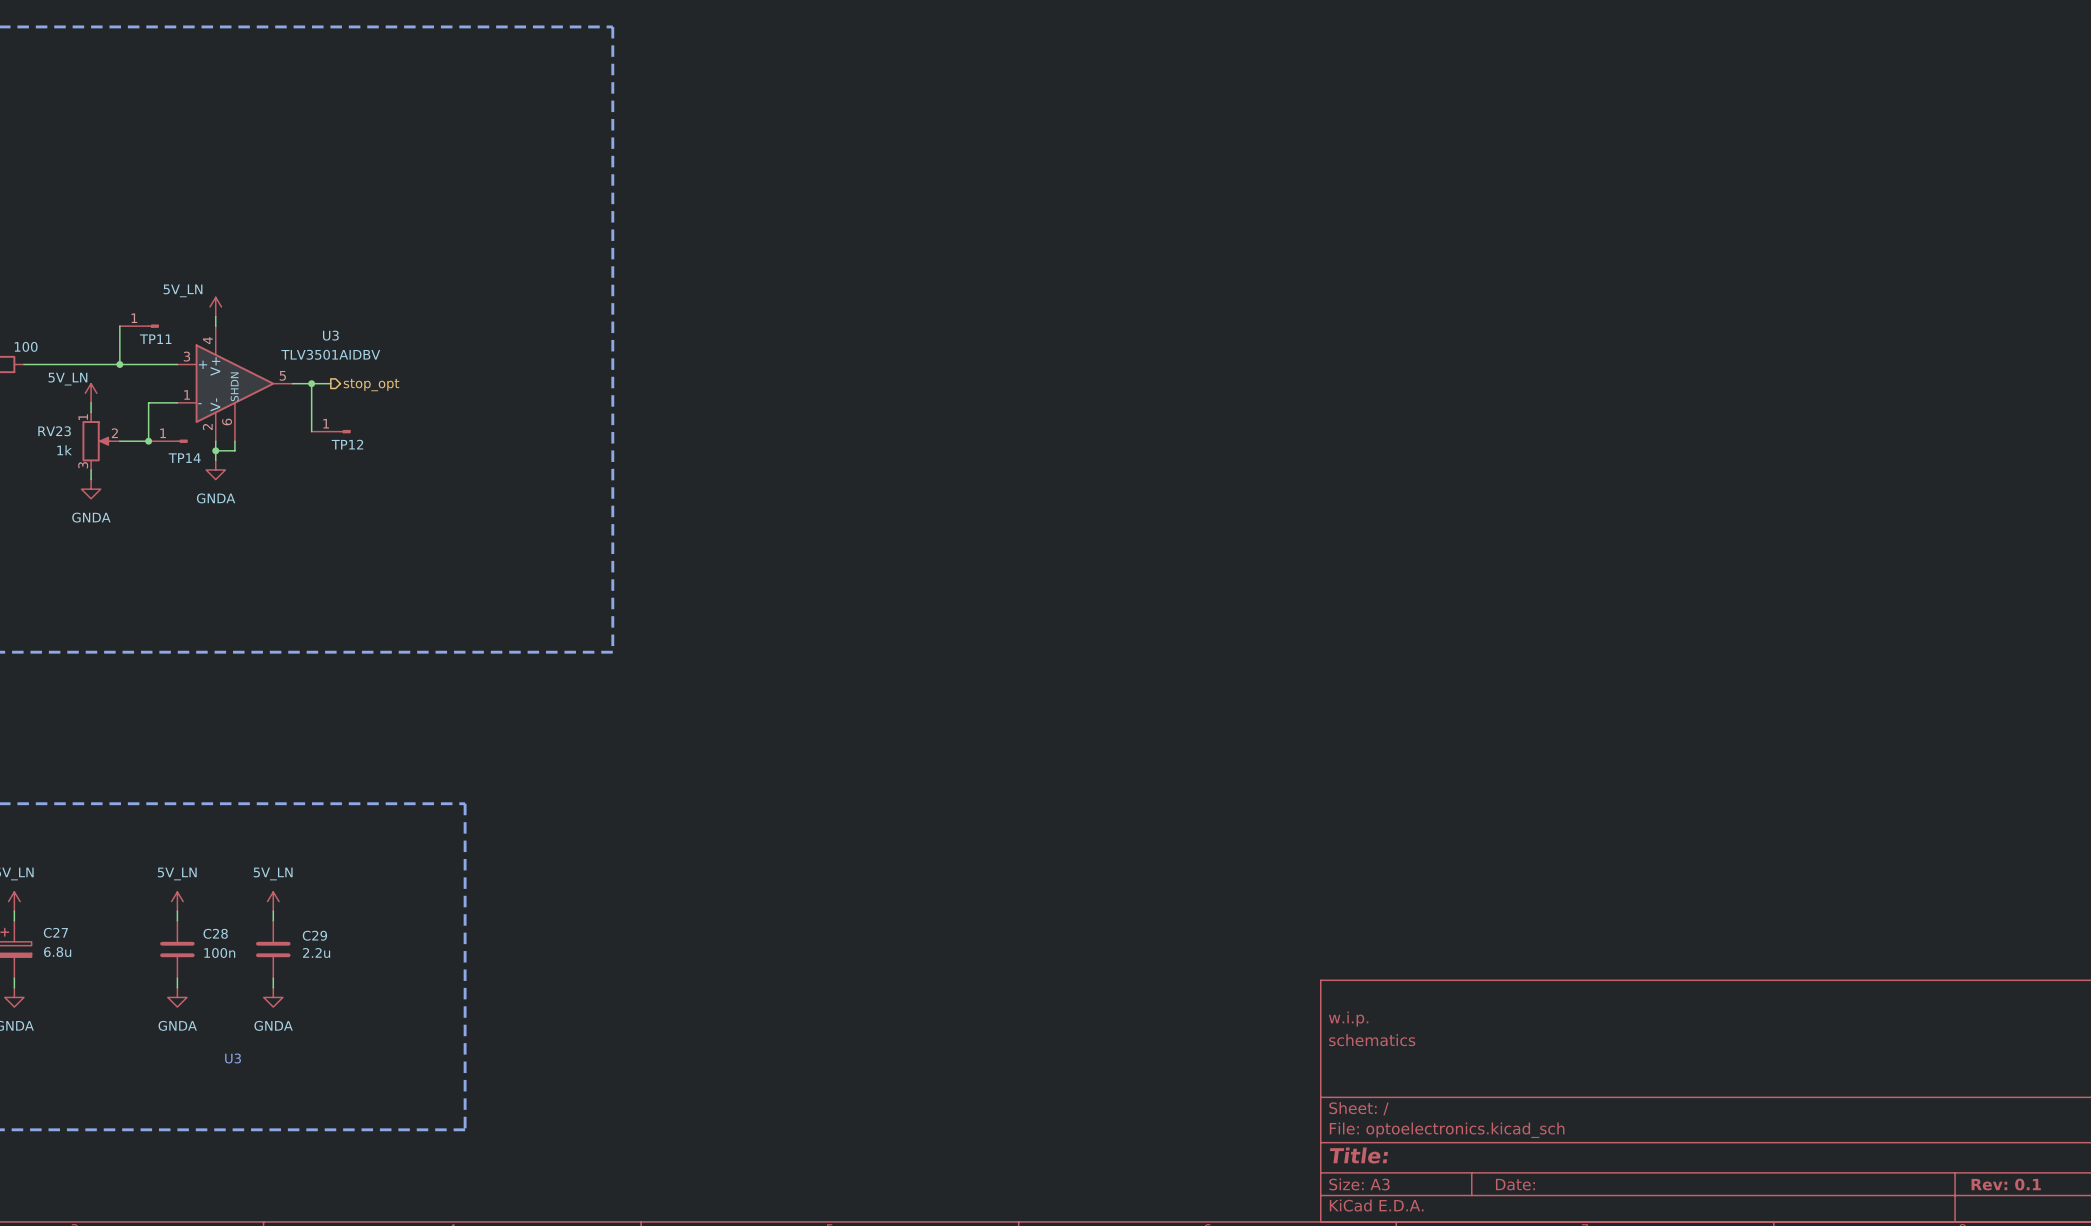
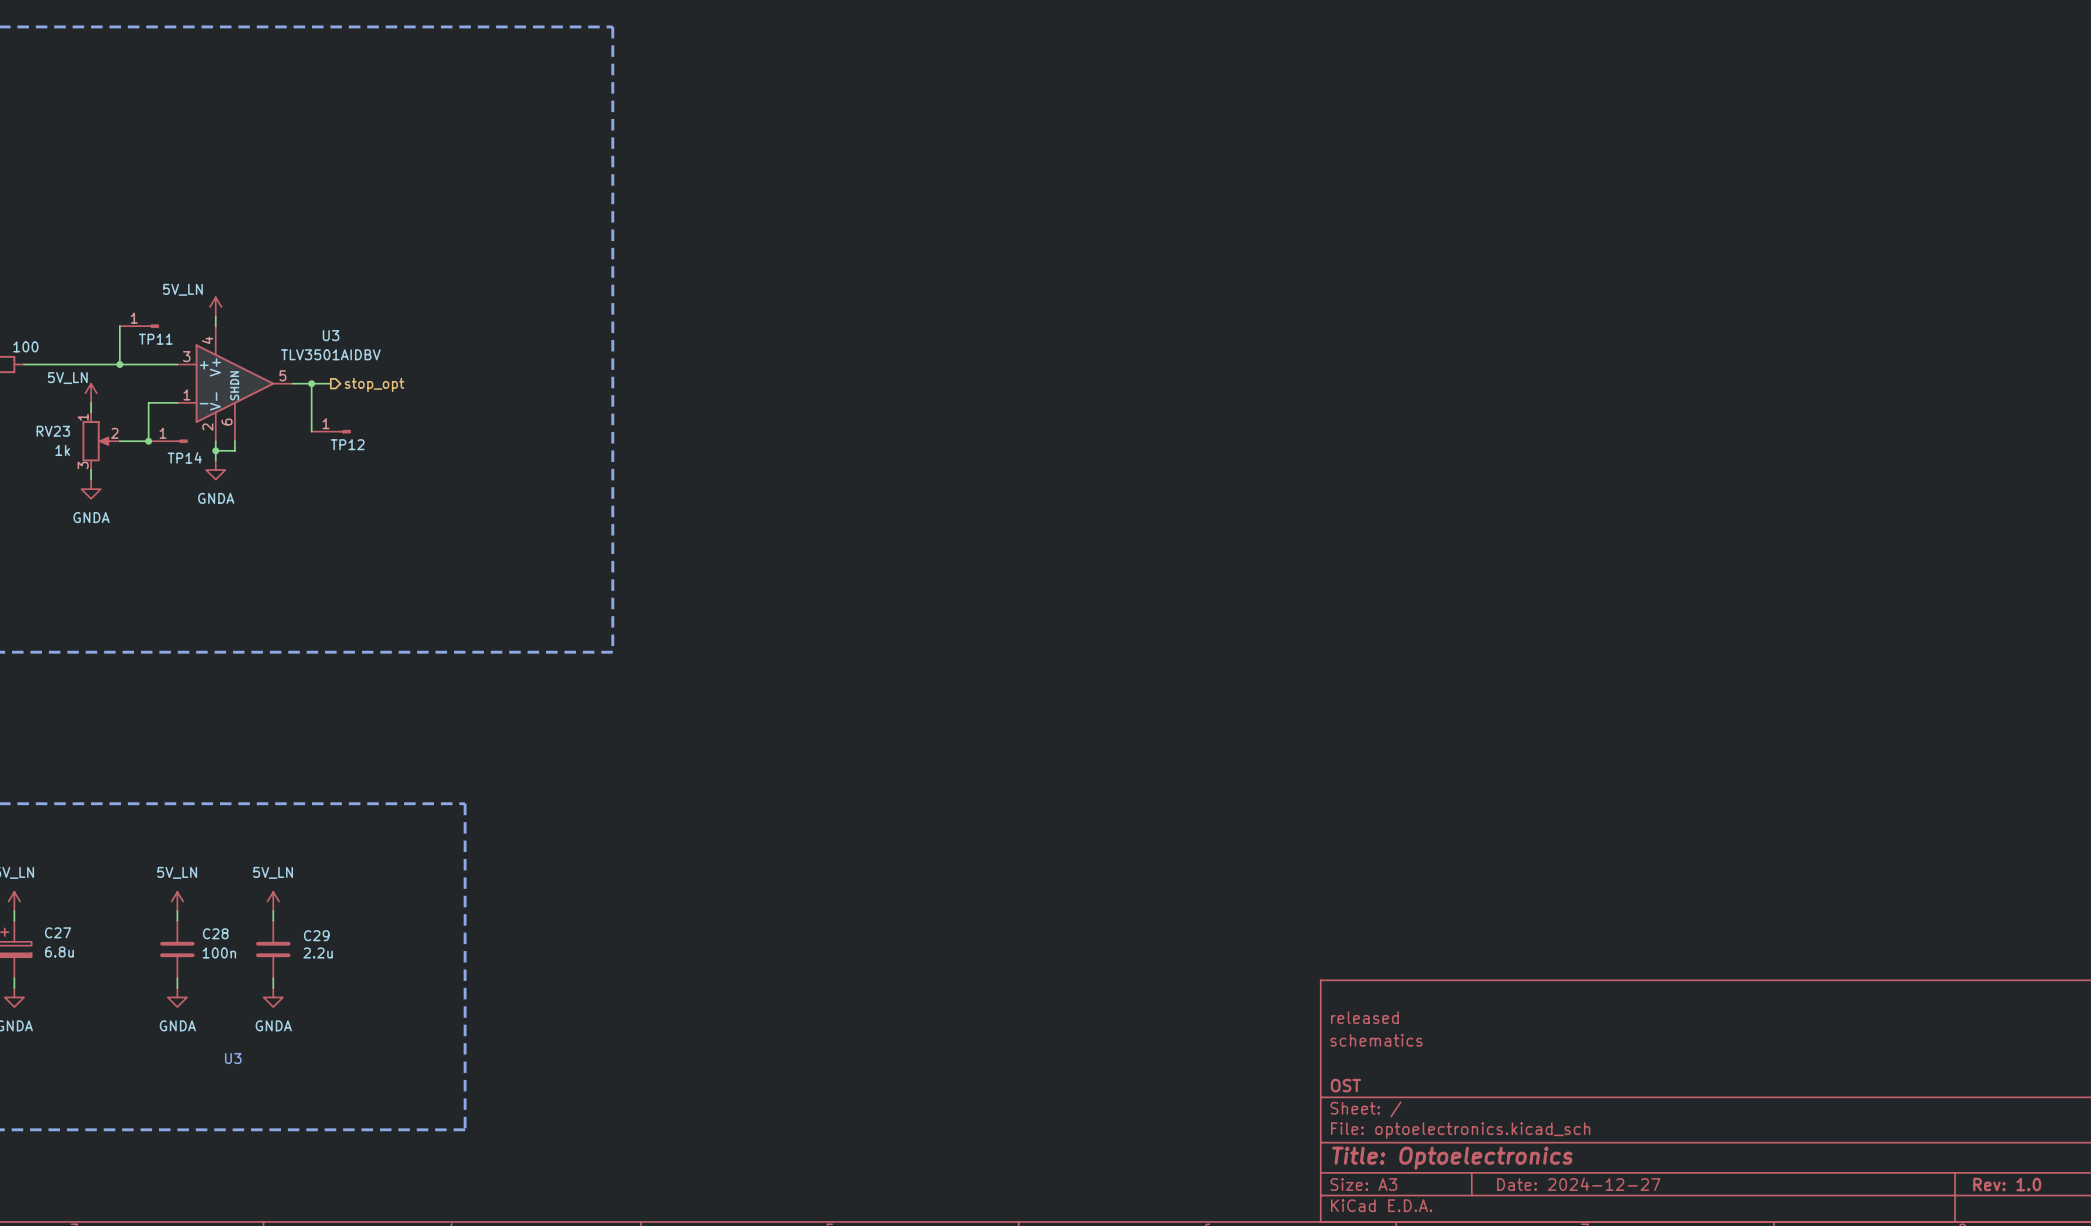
title block: w.i.p. (1348, 1019) -> released (1364, 1017)
title block: none -> OST (1345, 1085)
title block: Title: (1358, 1155) -> Title: Optoelectronics (1452, 1158)
title block: Date: (1515, 1184) -> Date: 2024-12-27 (1578, 1184)
title block: Rev: 0.1 (2006, 1184) -> Rev: 1.0 (2007, 1184)

